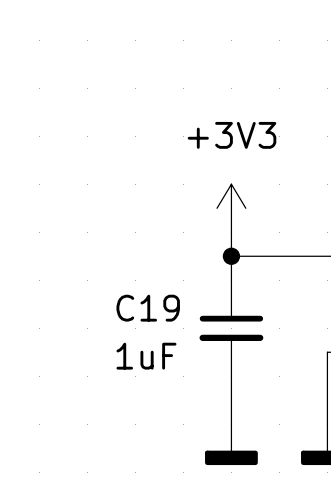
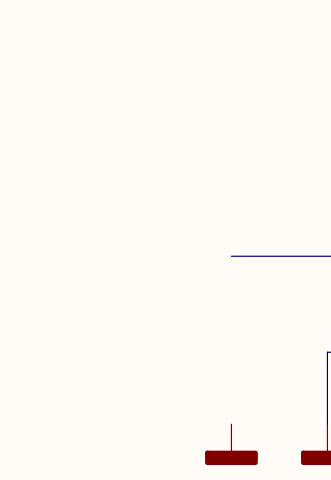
power symbol: +3V3 (231, 208) -> none
wire: (231, 232) (231, 280) -> none
junction: (231, 256) -> none
C19: 1uF (231, 328) -> none
wire: (231, 376) (231, 424) -> none

